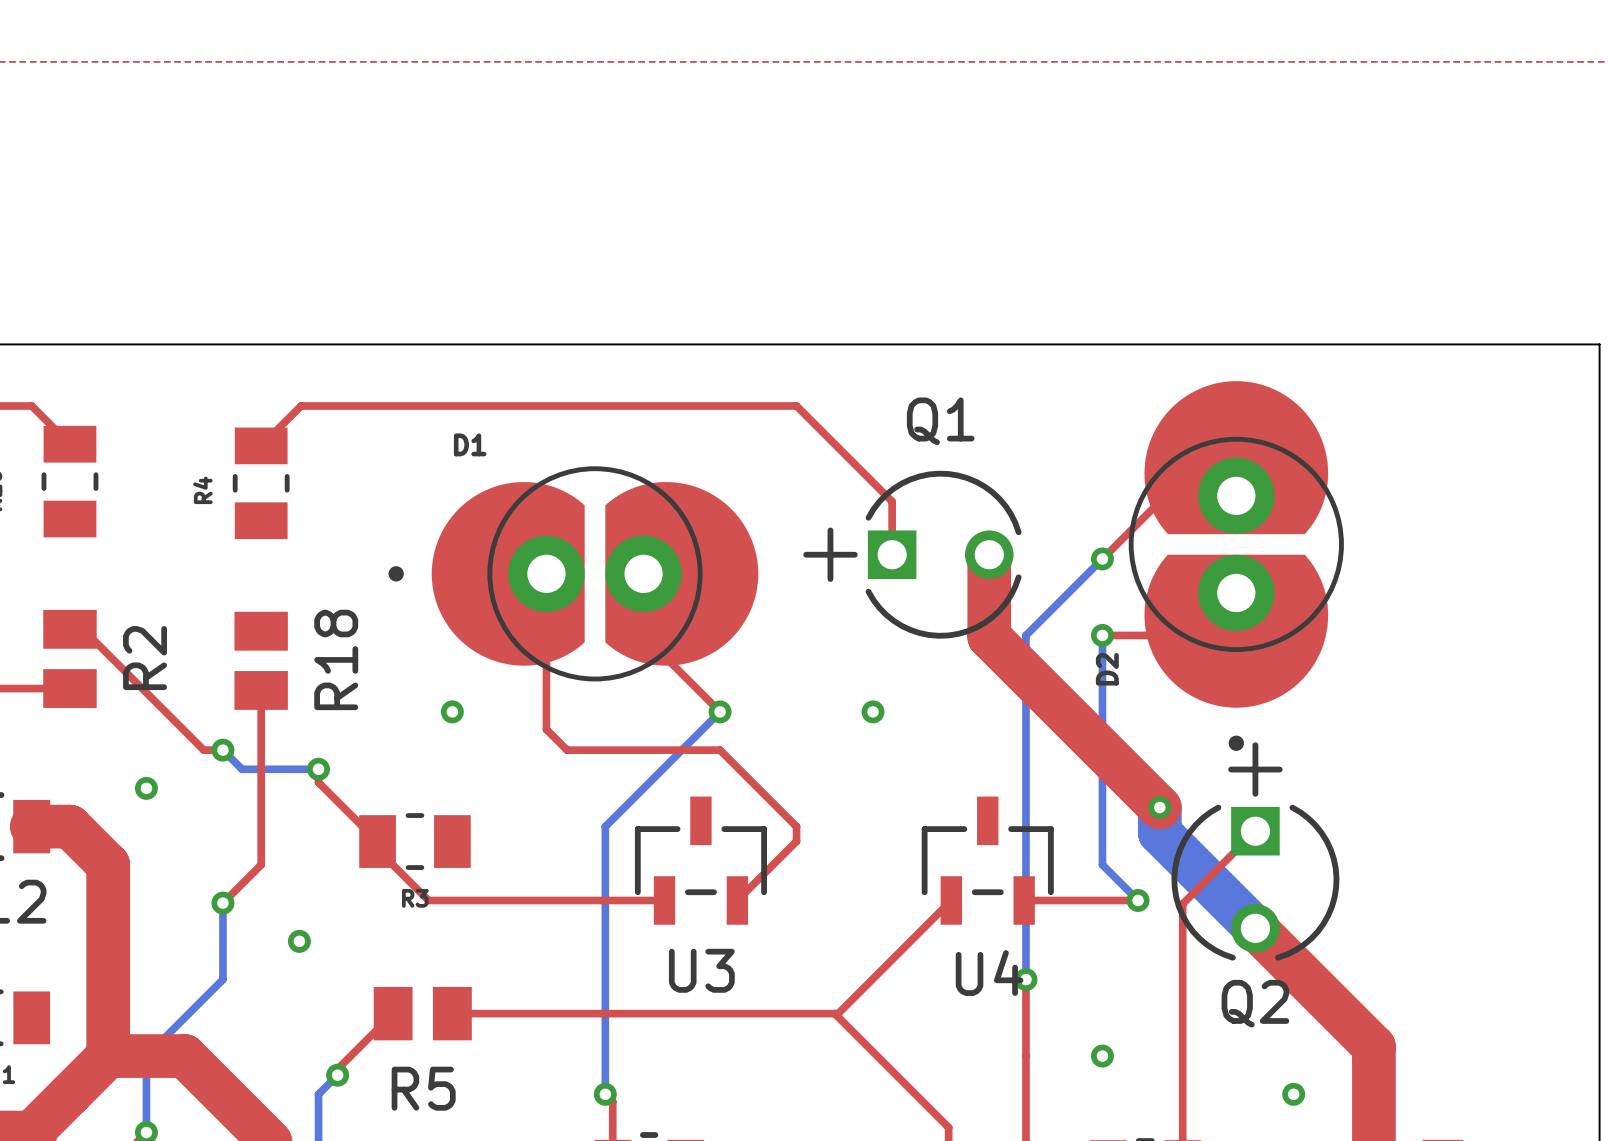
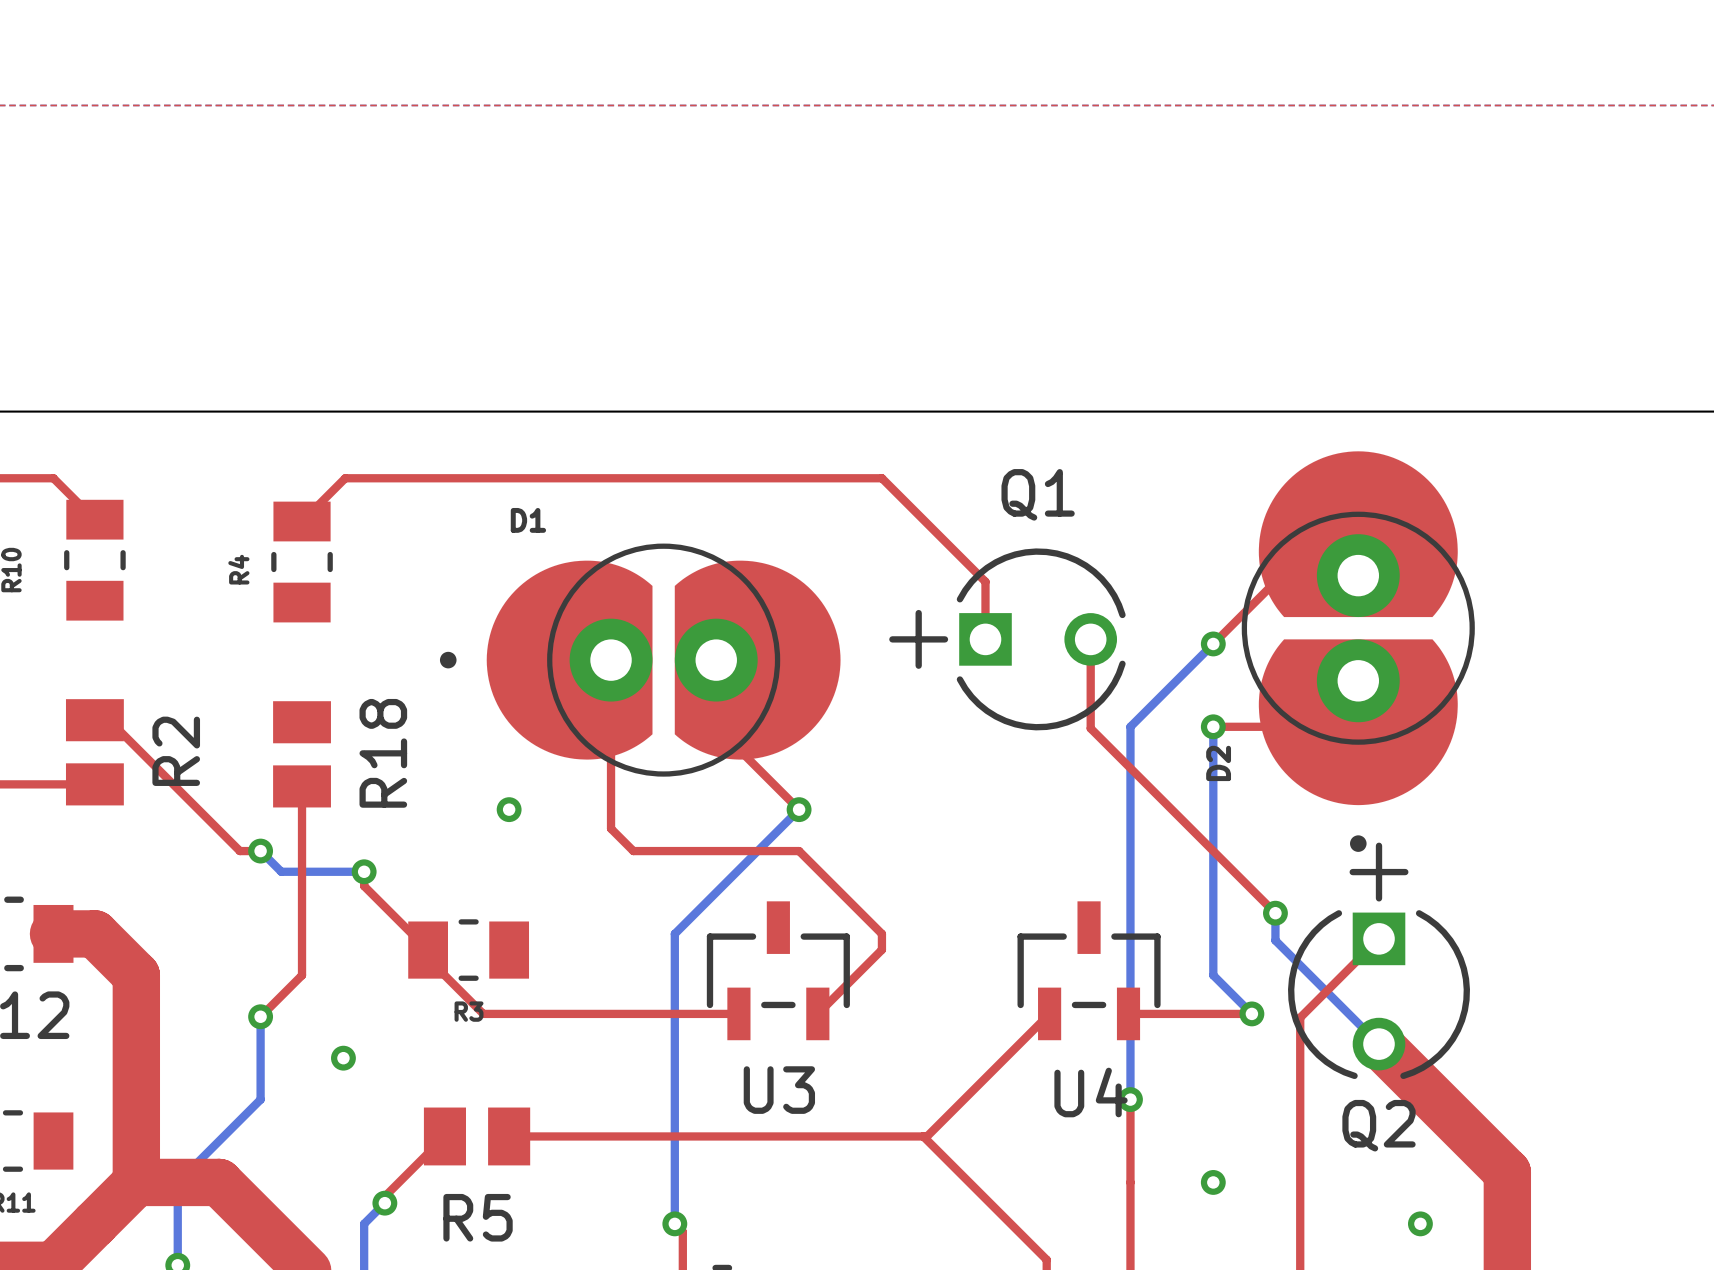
top track width: thick (989, 554) (989, 636) (1159, 807) -> thin (1090, 639) (1090, 728) (1275, 913)
via: (873, 711) -> none
via: (146, 788) -> none
bottom track width: thick (1159, 807) (1159, 832) (1255, 928) -> thin (1275, 913) (1275, 940) (1379, 1044)

